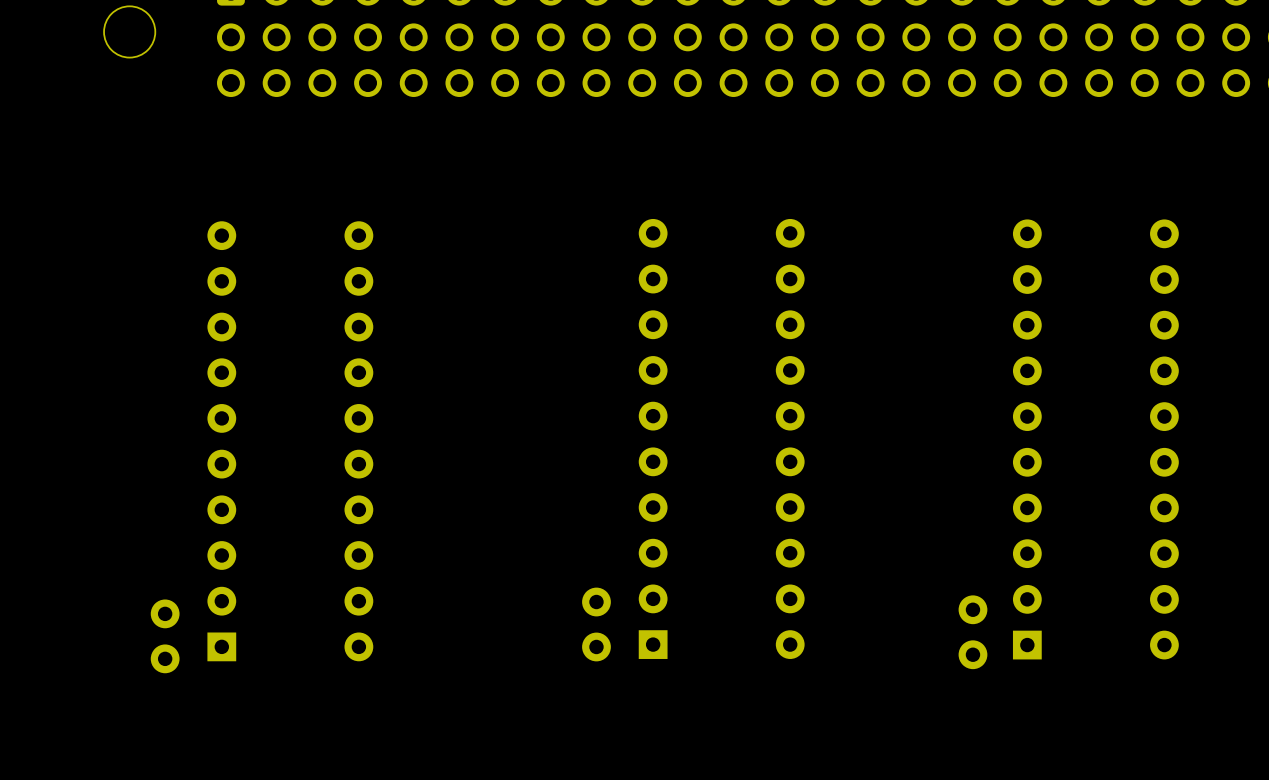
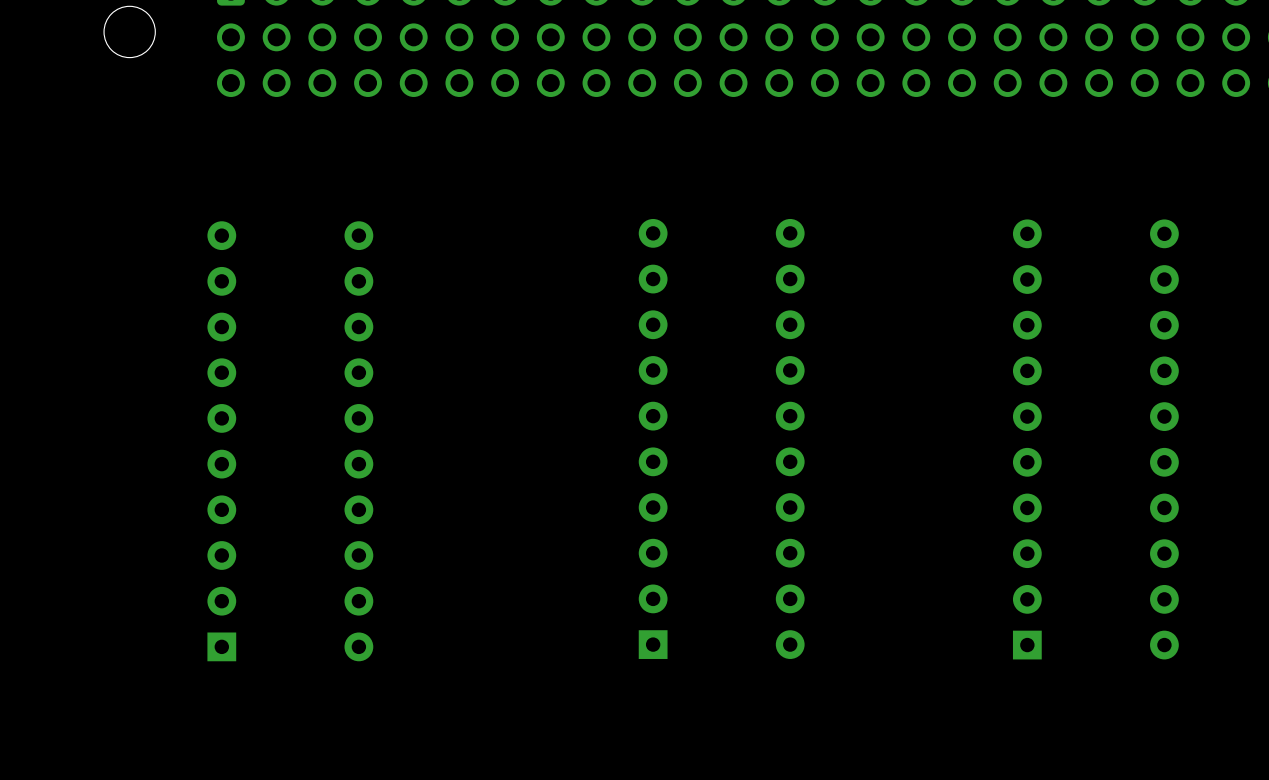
part: (596, 624) -> none
part: (972, 632) -> none
part: (165, 636) -> none

